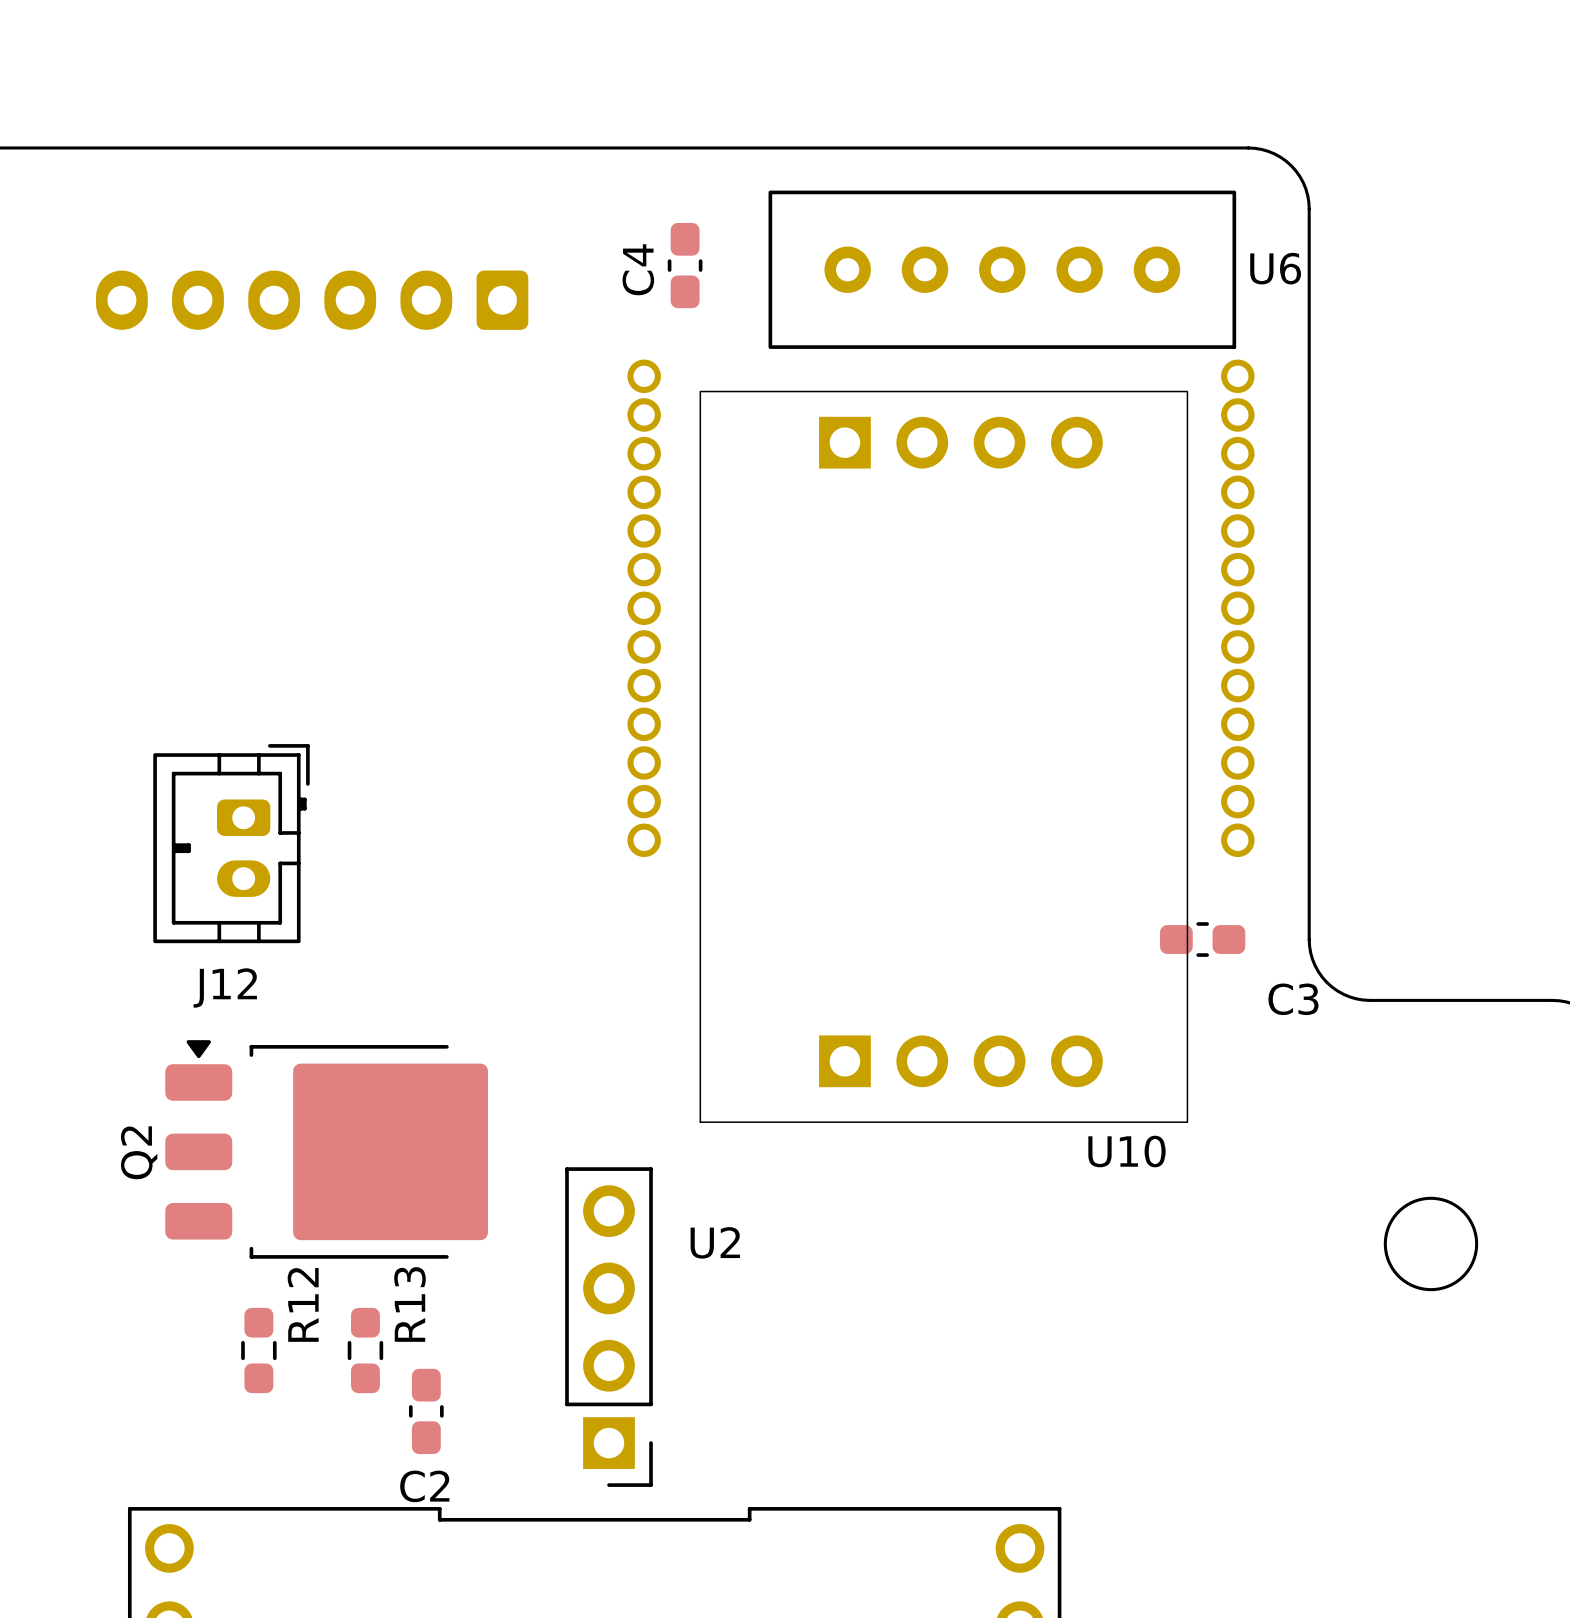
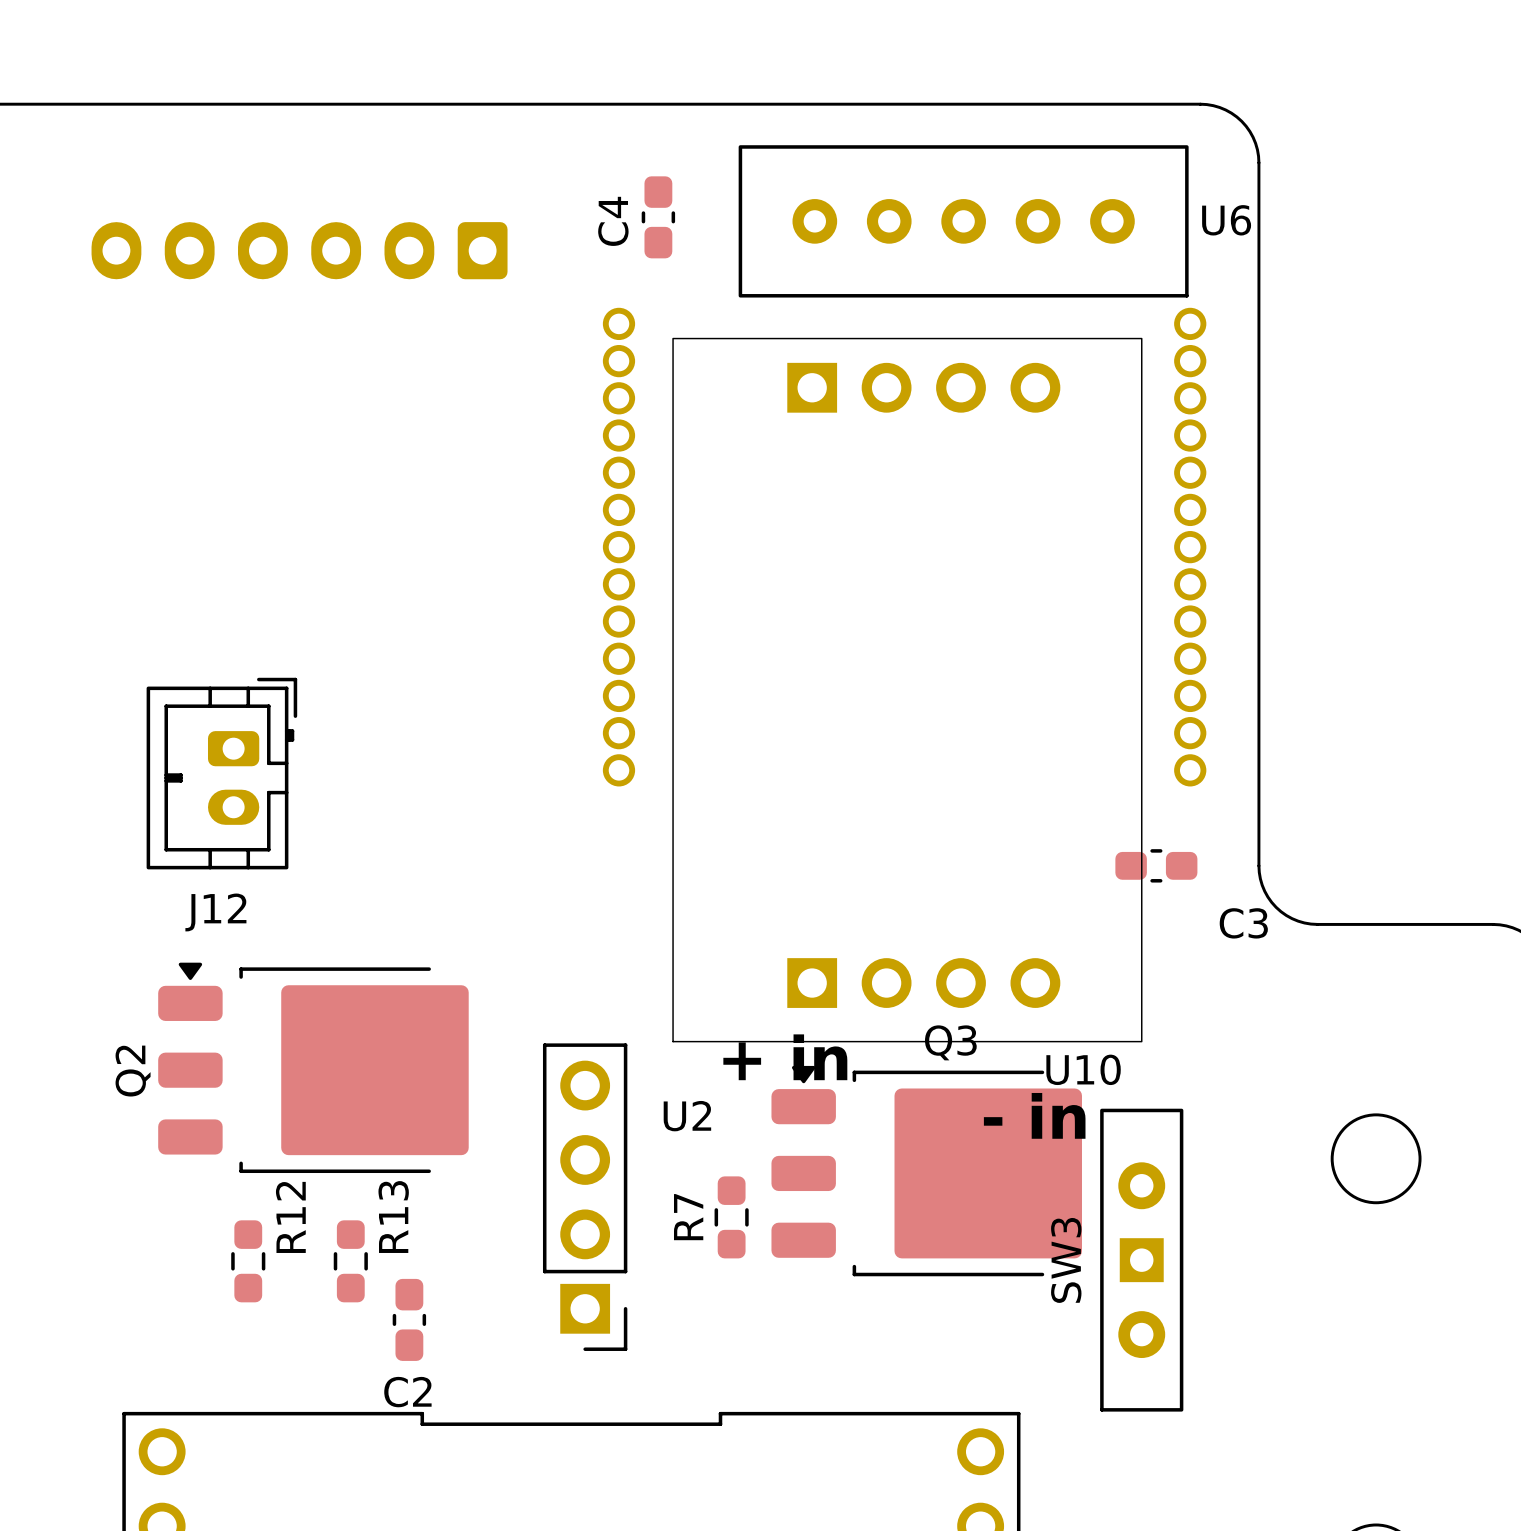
text: none -> + in (785, 1057)
text: none -> - in (1034, 1115)
Q3: none -> (926, 1171)
R7: none -> (731, 1217)
U2 position: (608, 1327) -> (585, 1197)
SW3: none -> (1141, 1260)

